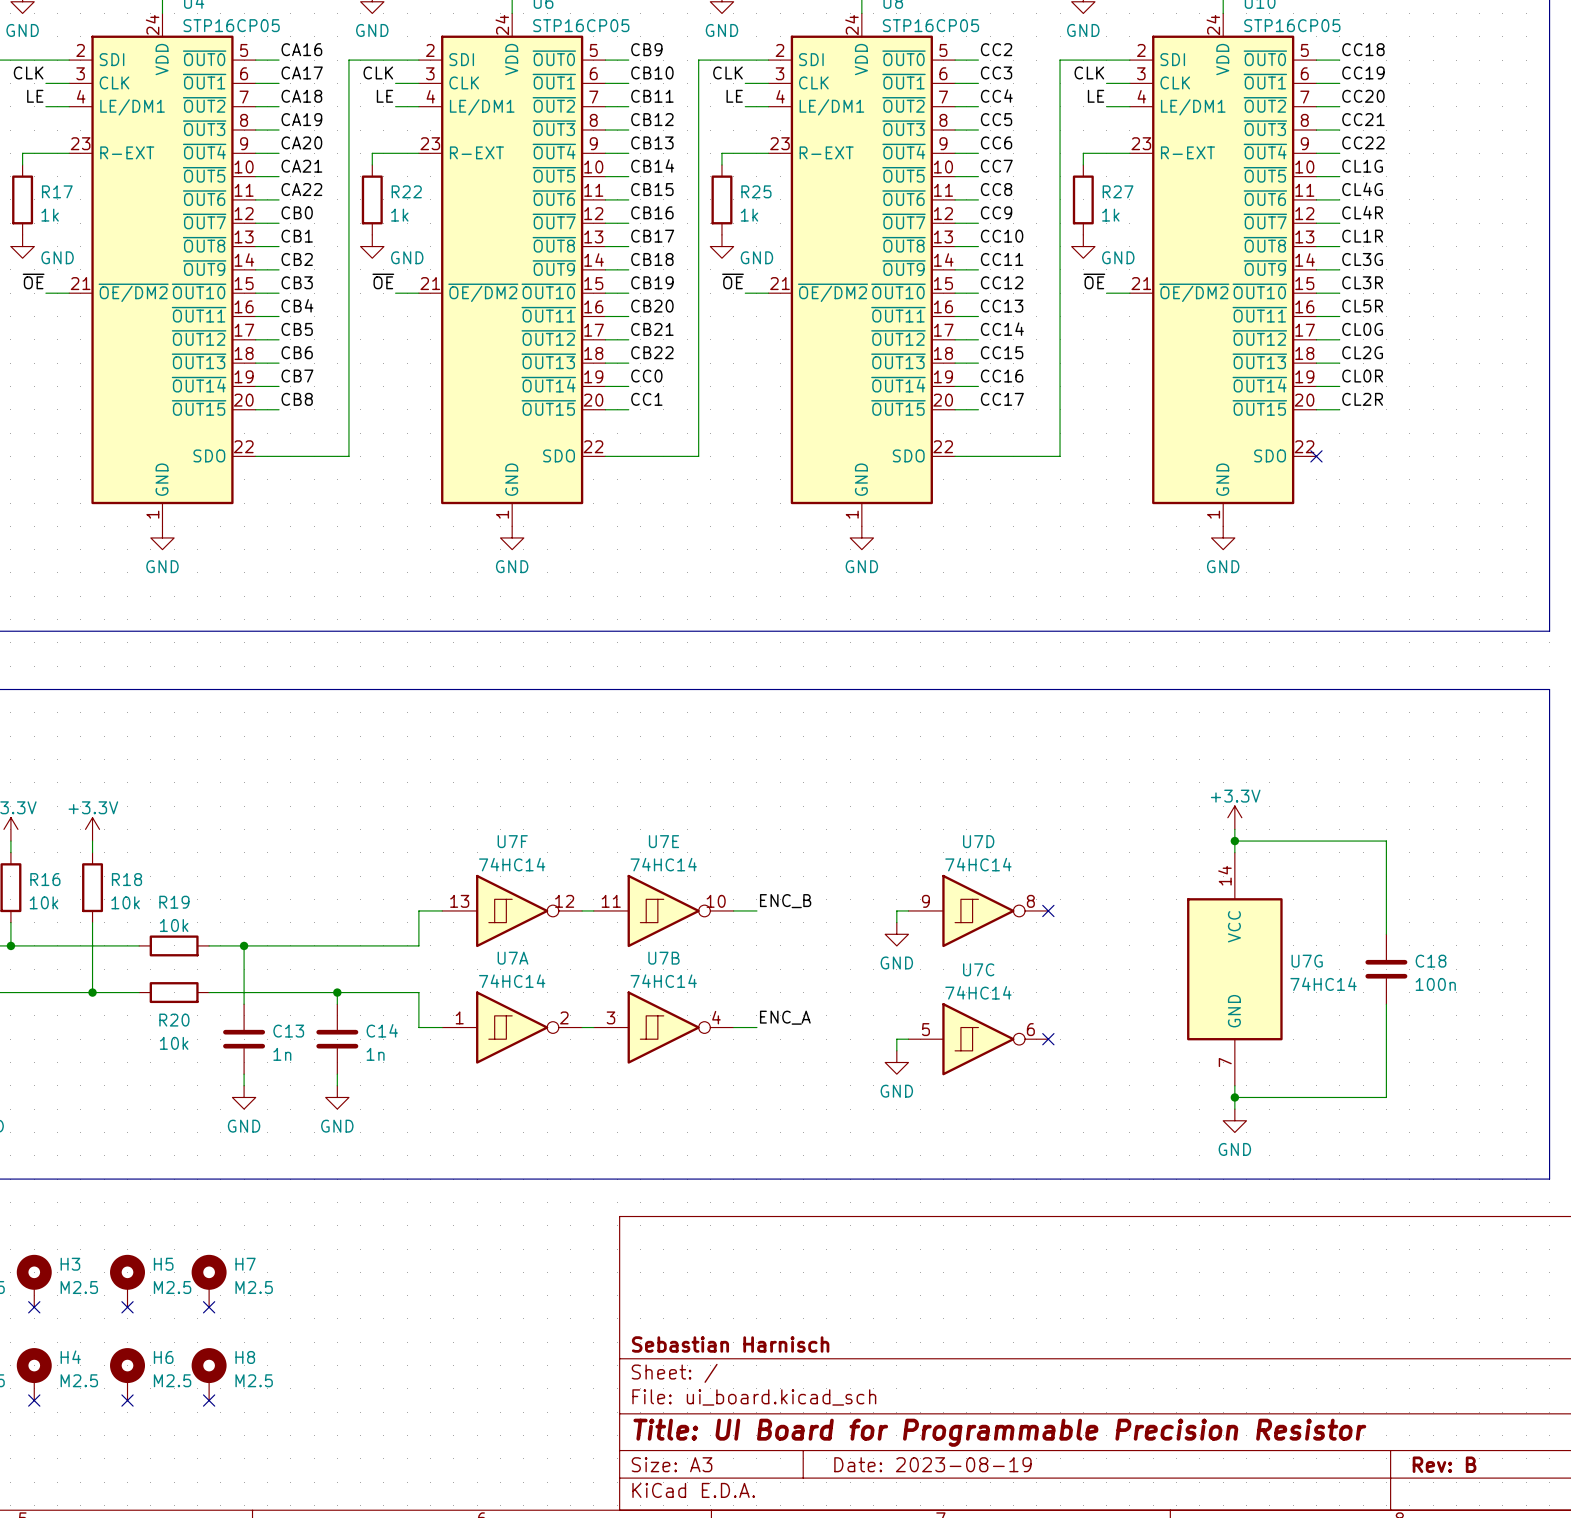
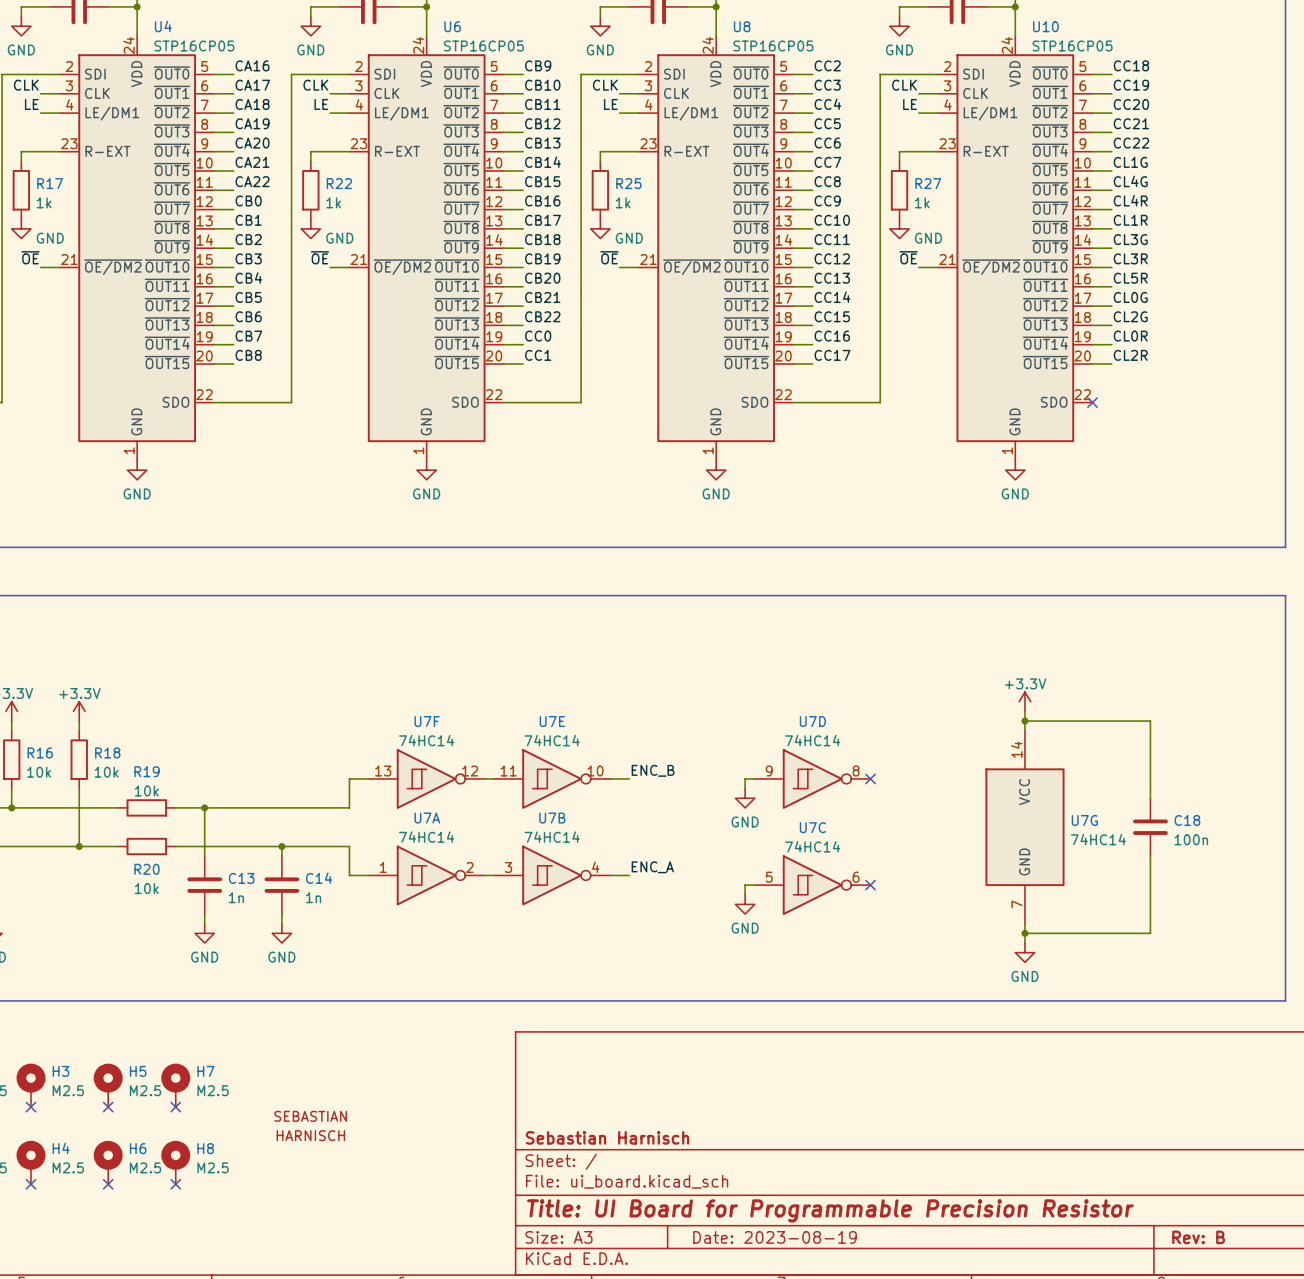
part: none -> (310, 1126)

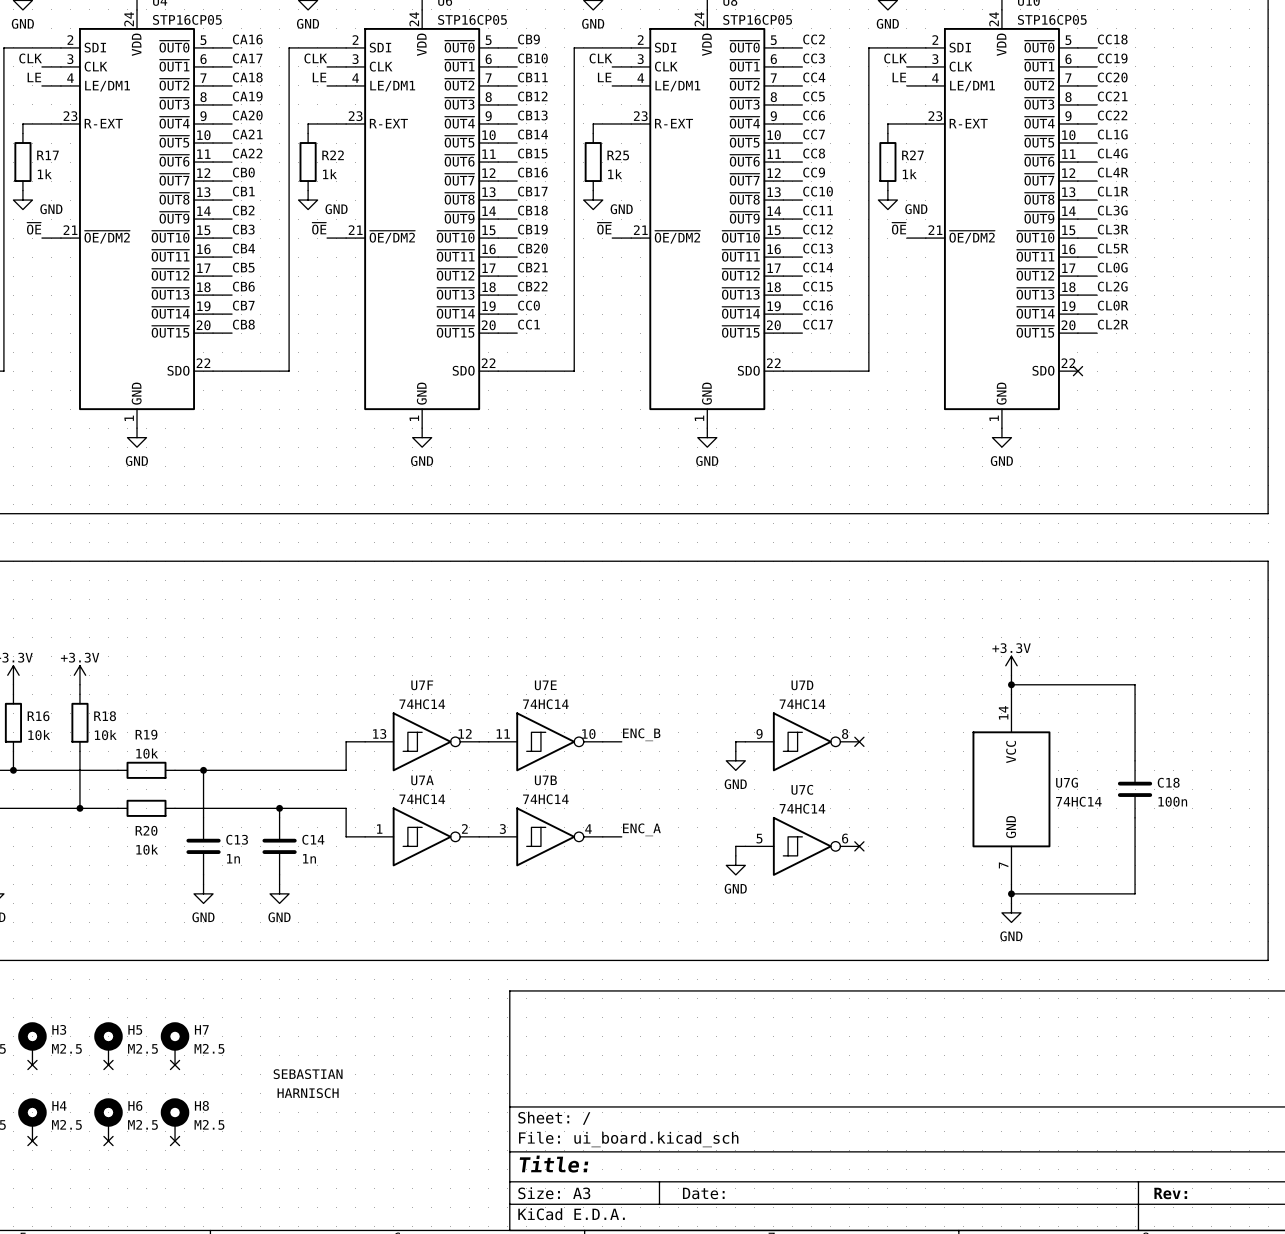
title block: Sebastian Harnisch (607, 1137) -> none
title block: Title: UI Board for Programmable Precision Resistor (830, 1210) -> Title: (553, 1164)
title block: Date: 2023-08-19 (775, 1237) -> Date: (703, 1193)
title block: Rev: B (1198, 1237) -> Rev: (1170, 1193)

